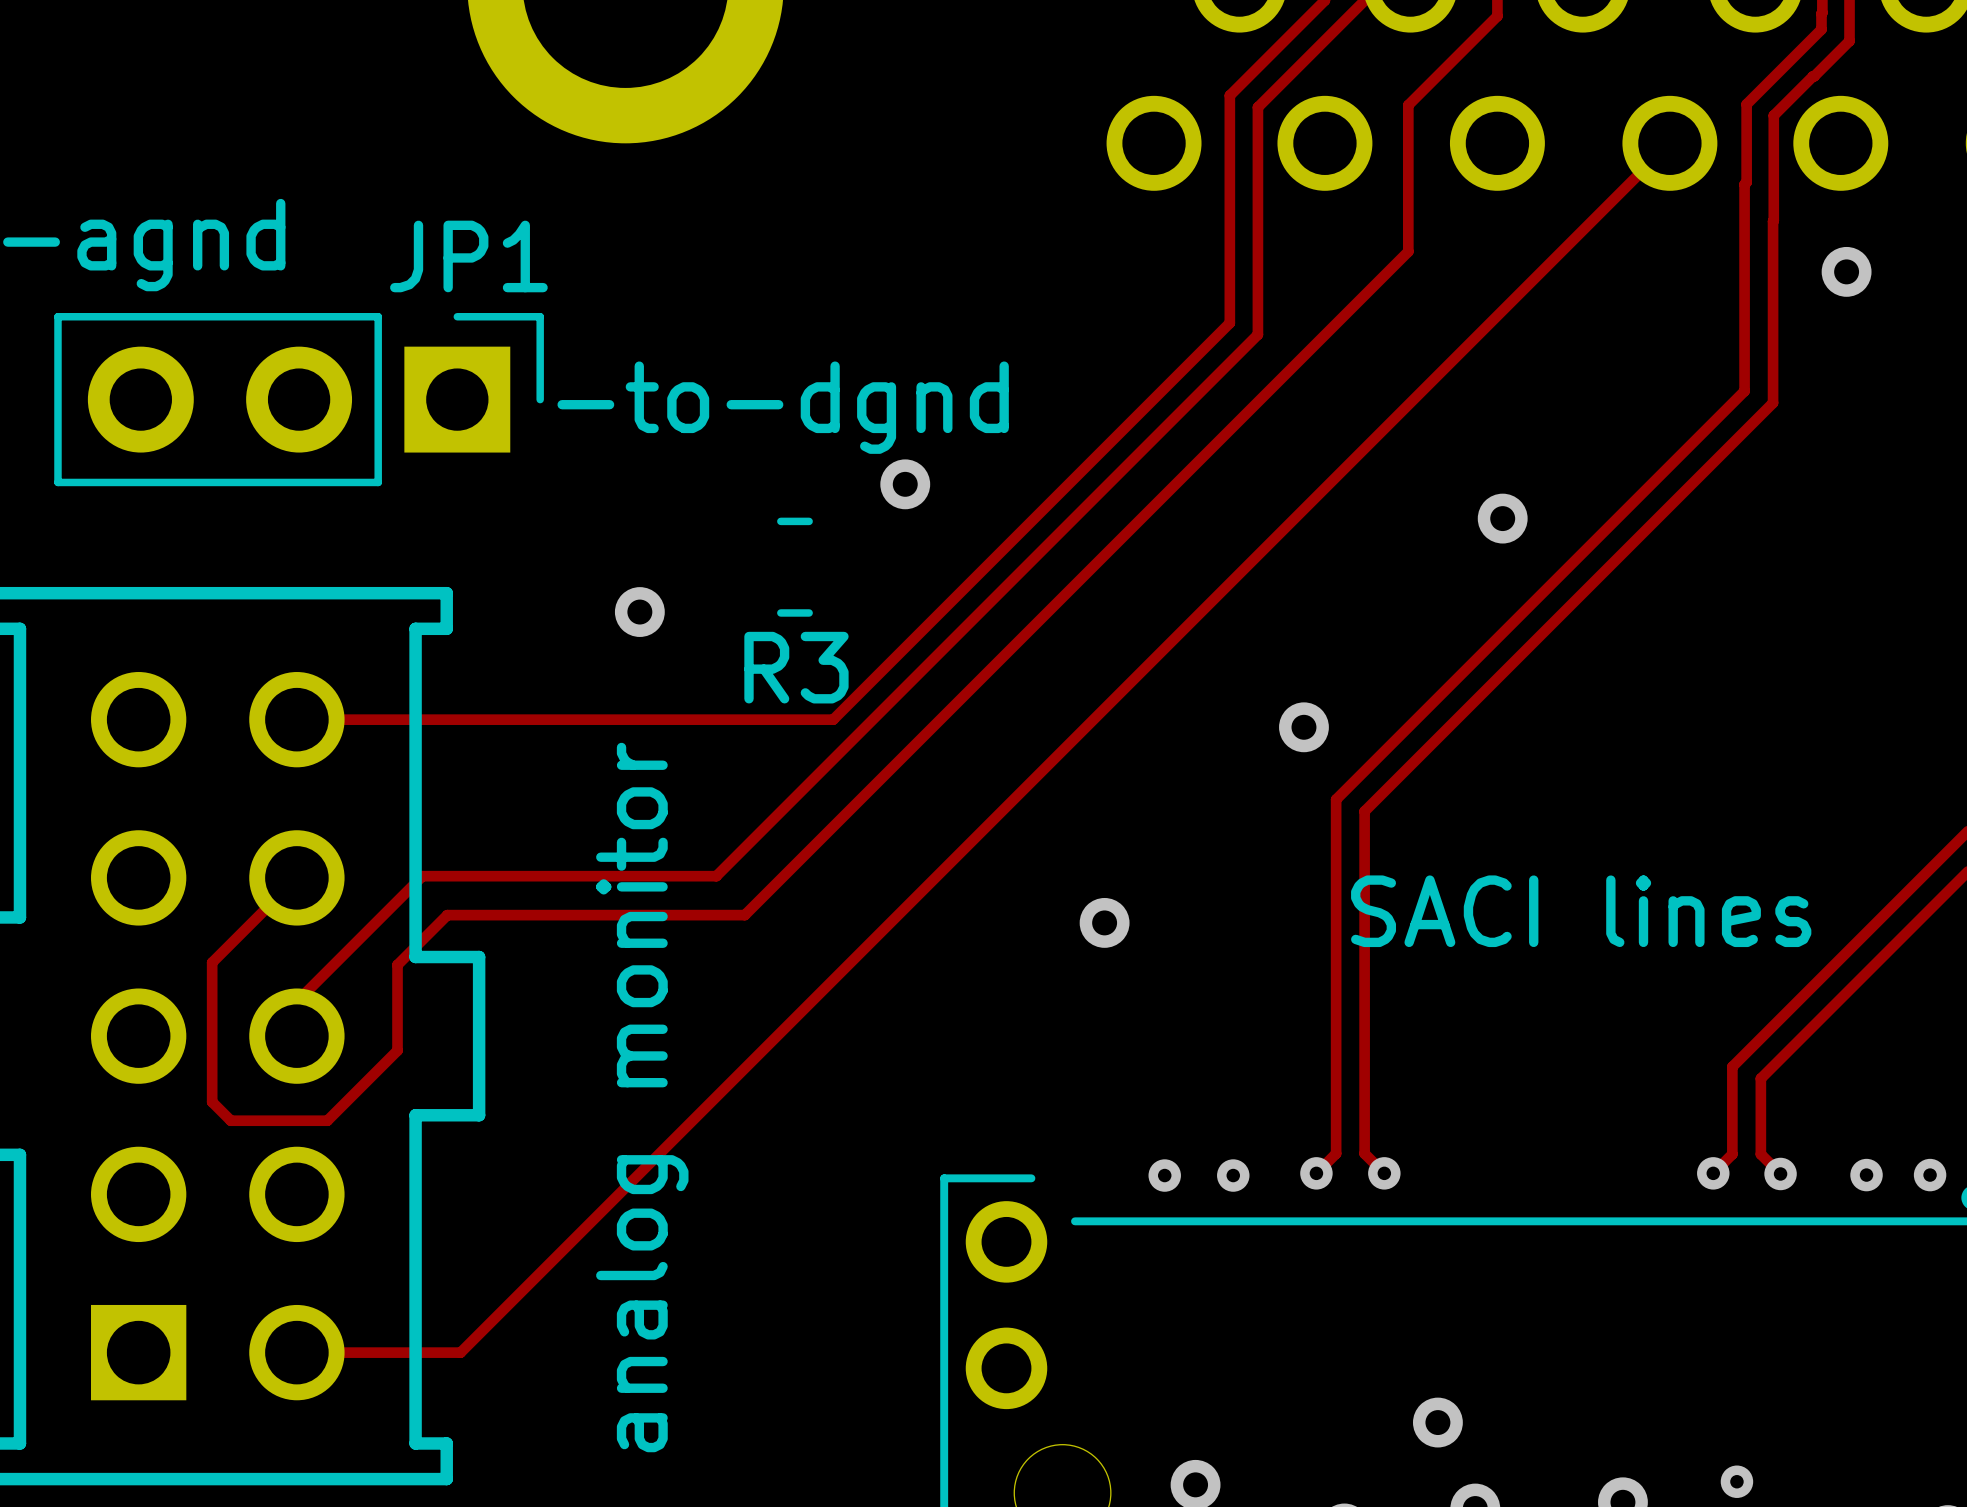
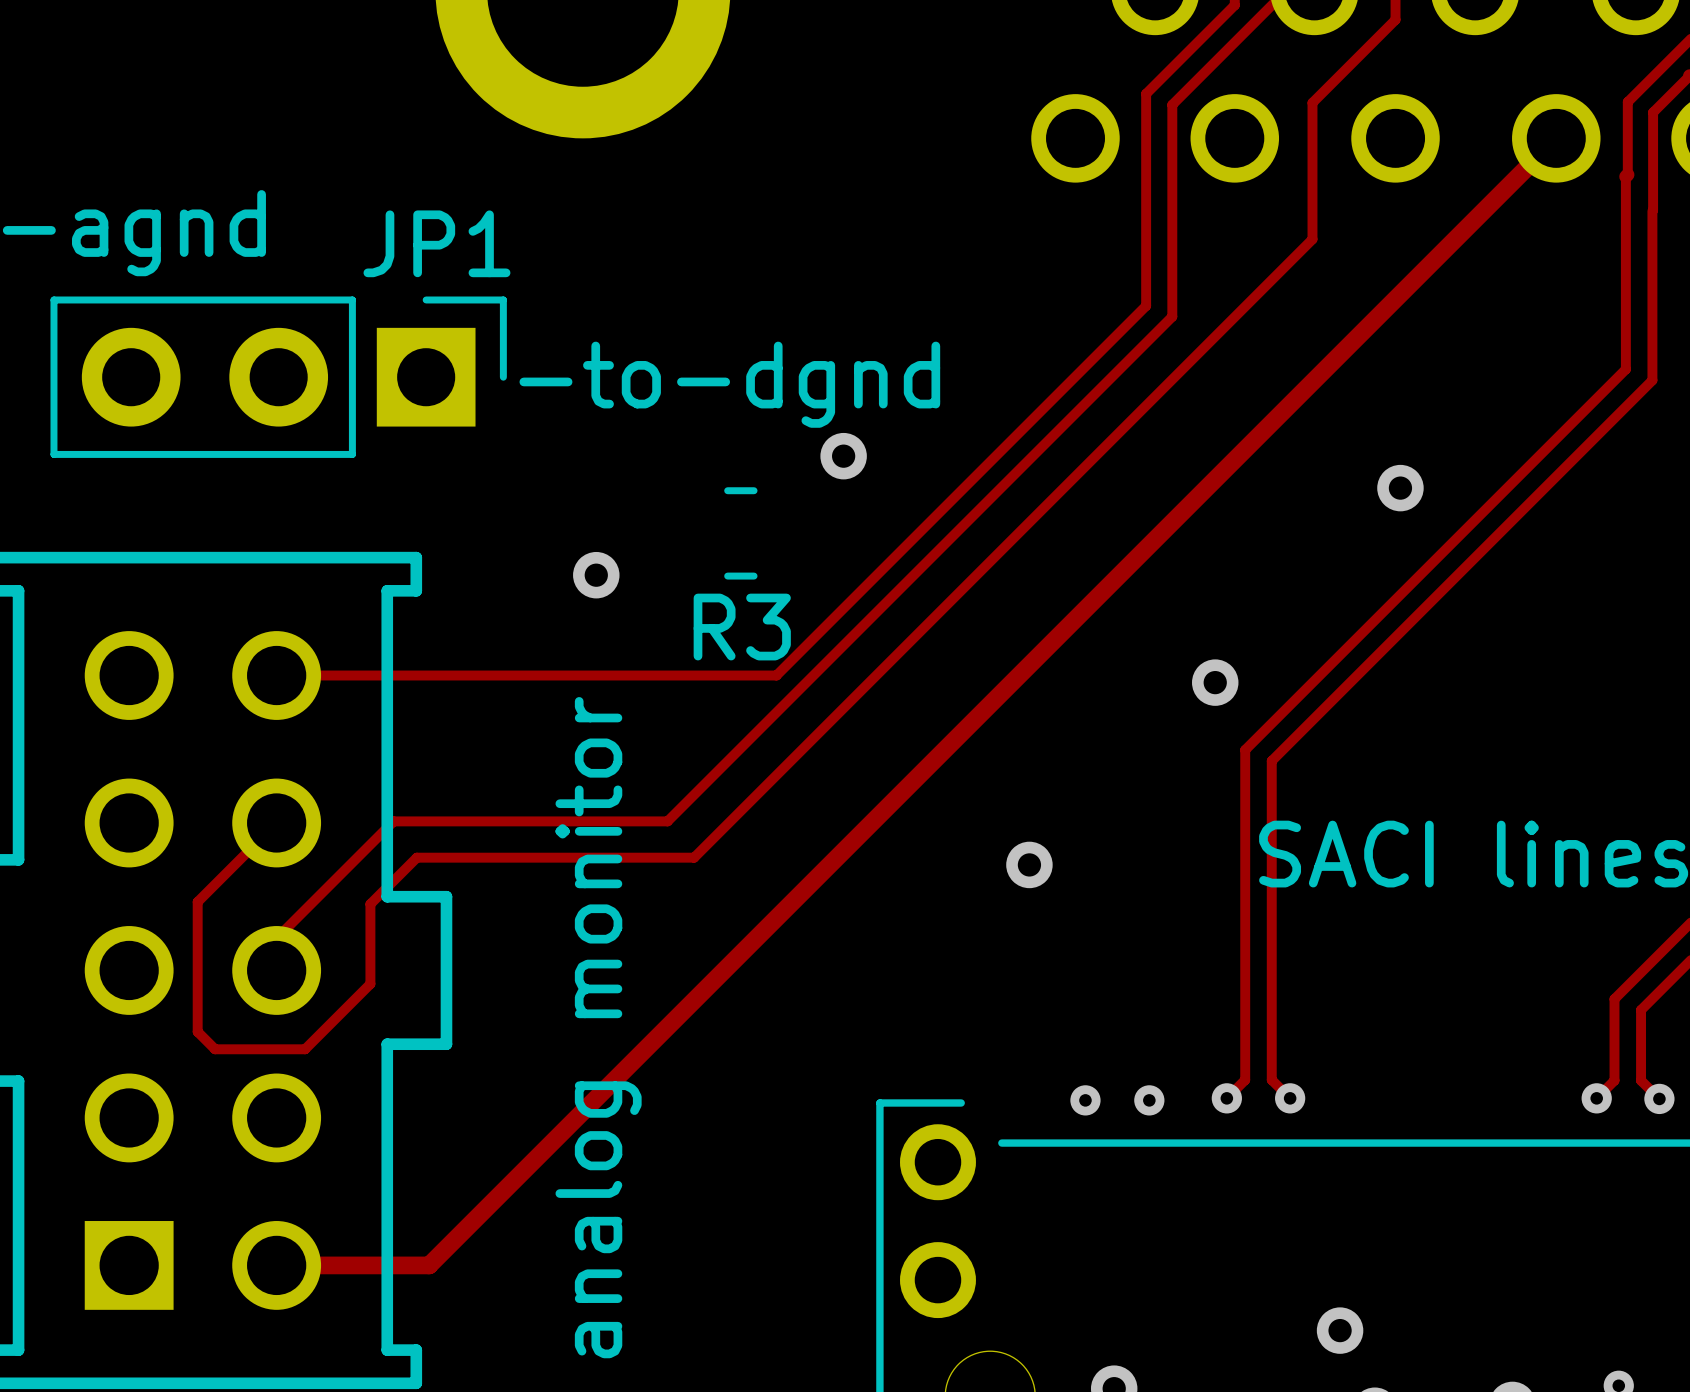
track width: thin (1669, 143) (460, 1352) (296, 1352) -> thick (1556, 138) (429, 1265) (276, 1265)

